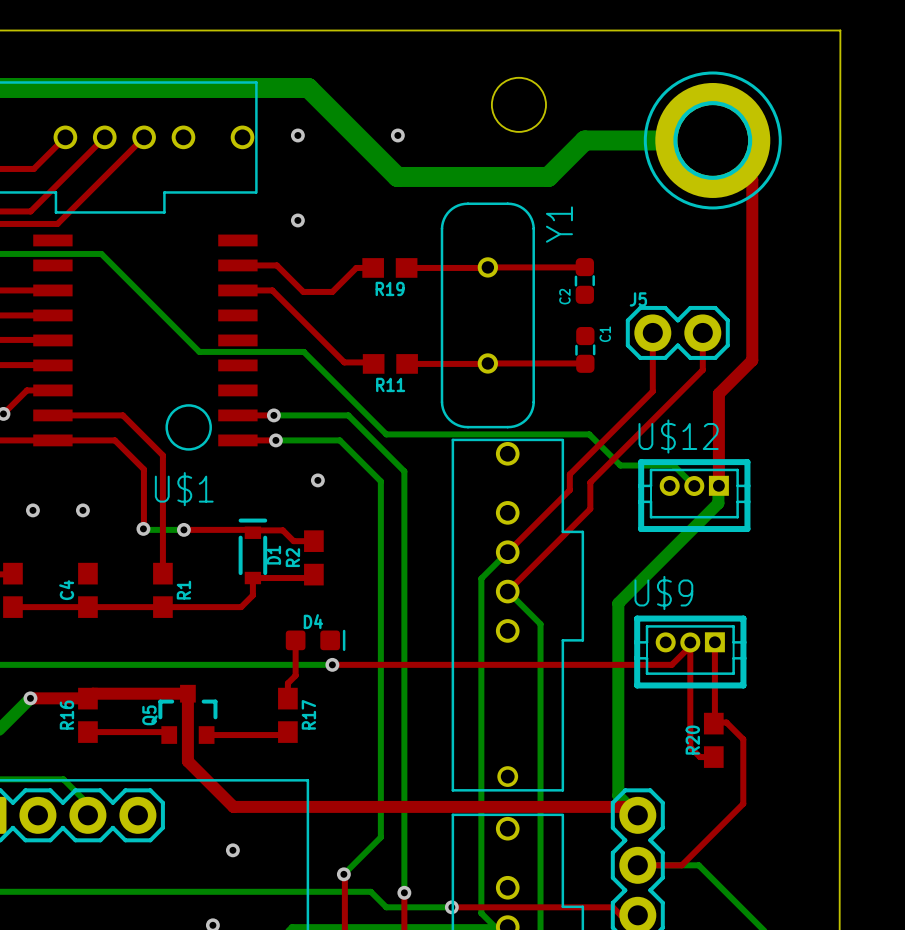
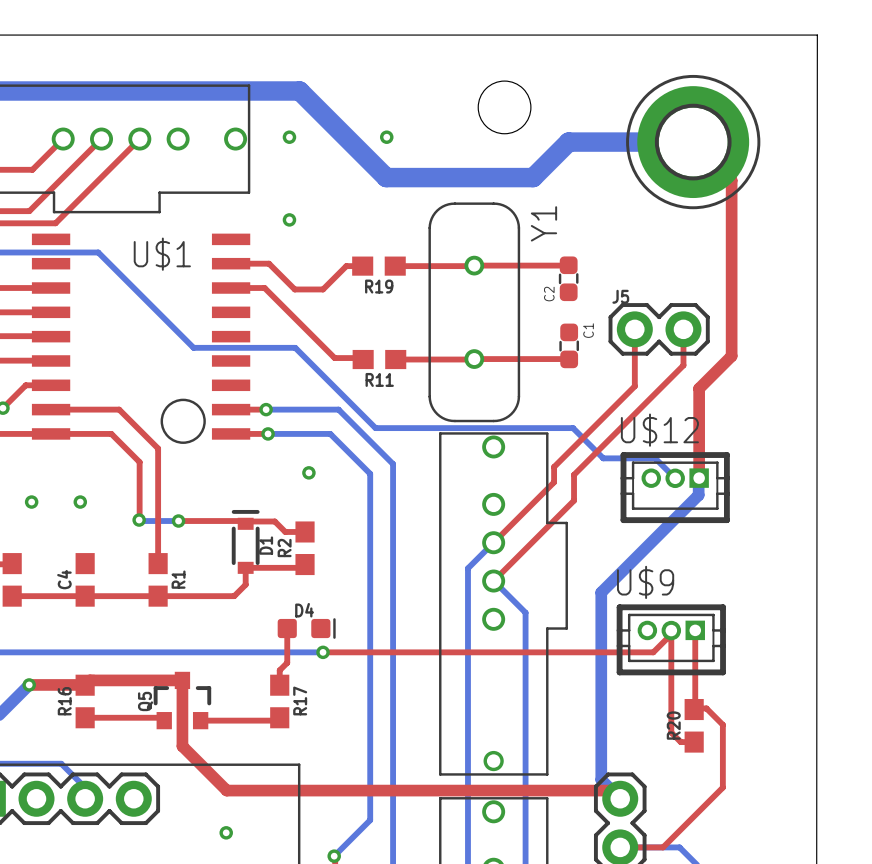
U$1 name position: U$1 (184, 489) -> U$1 (162, 254)

